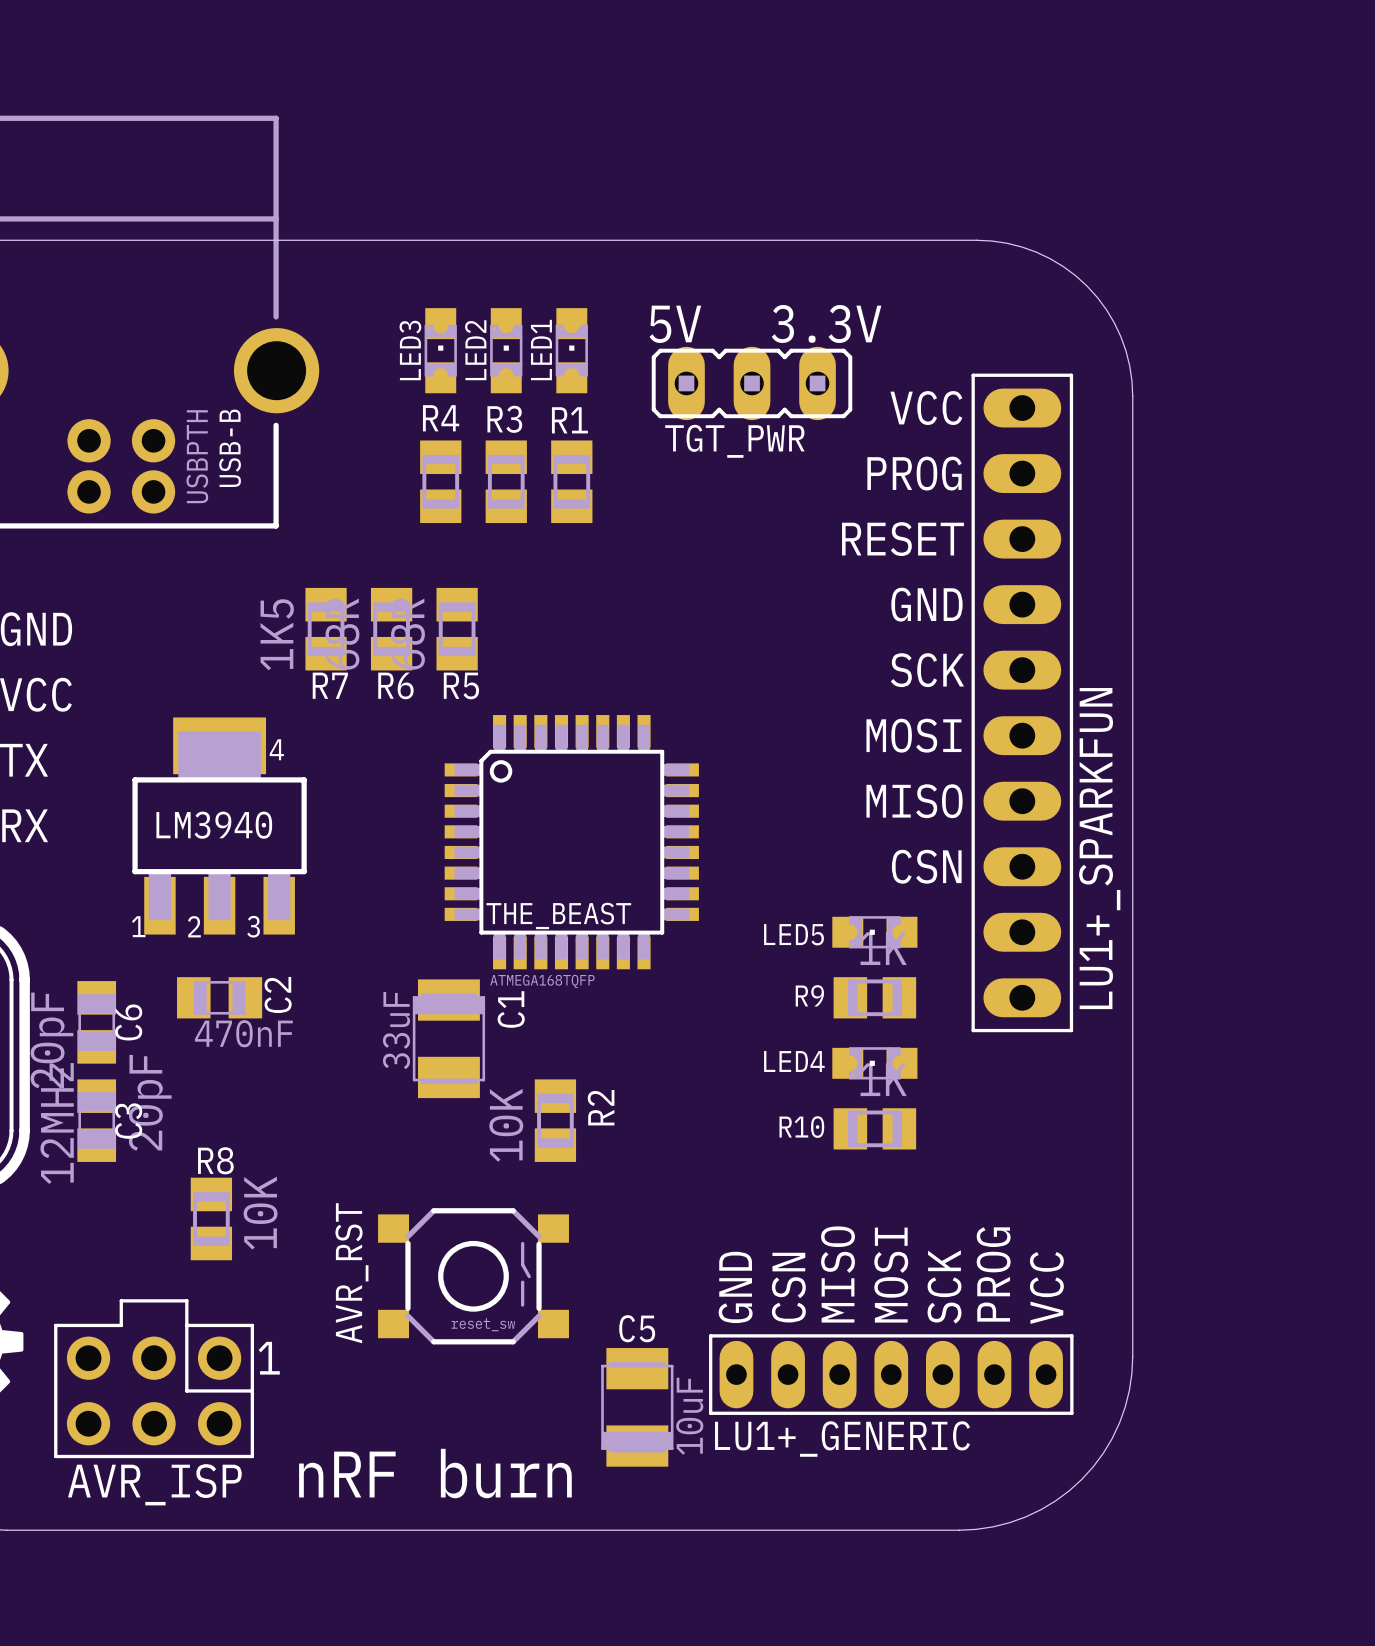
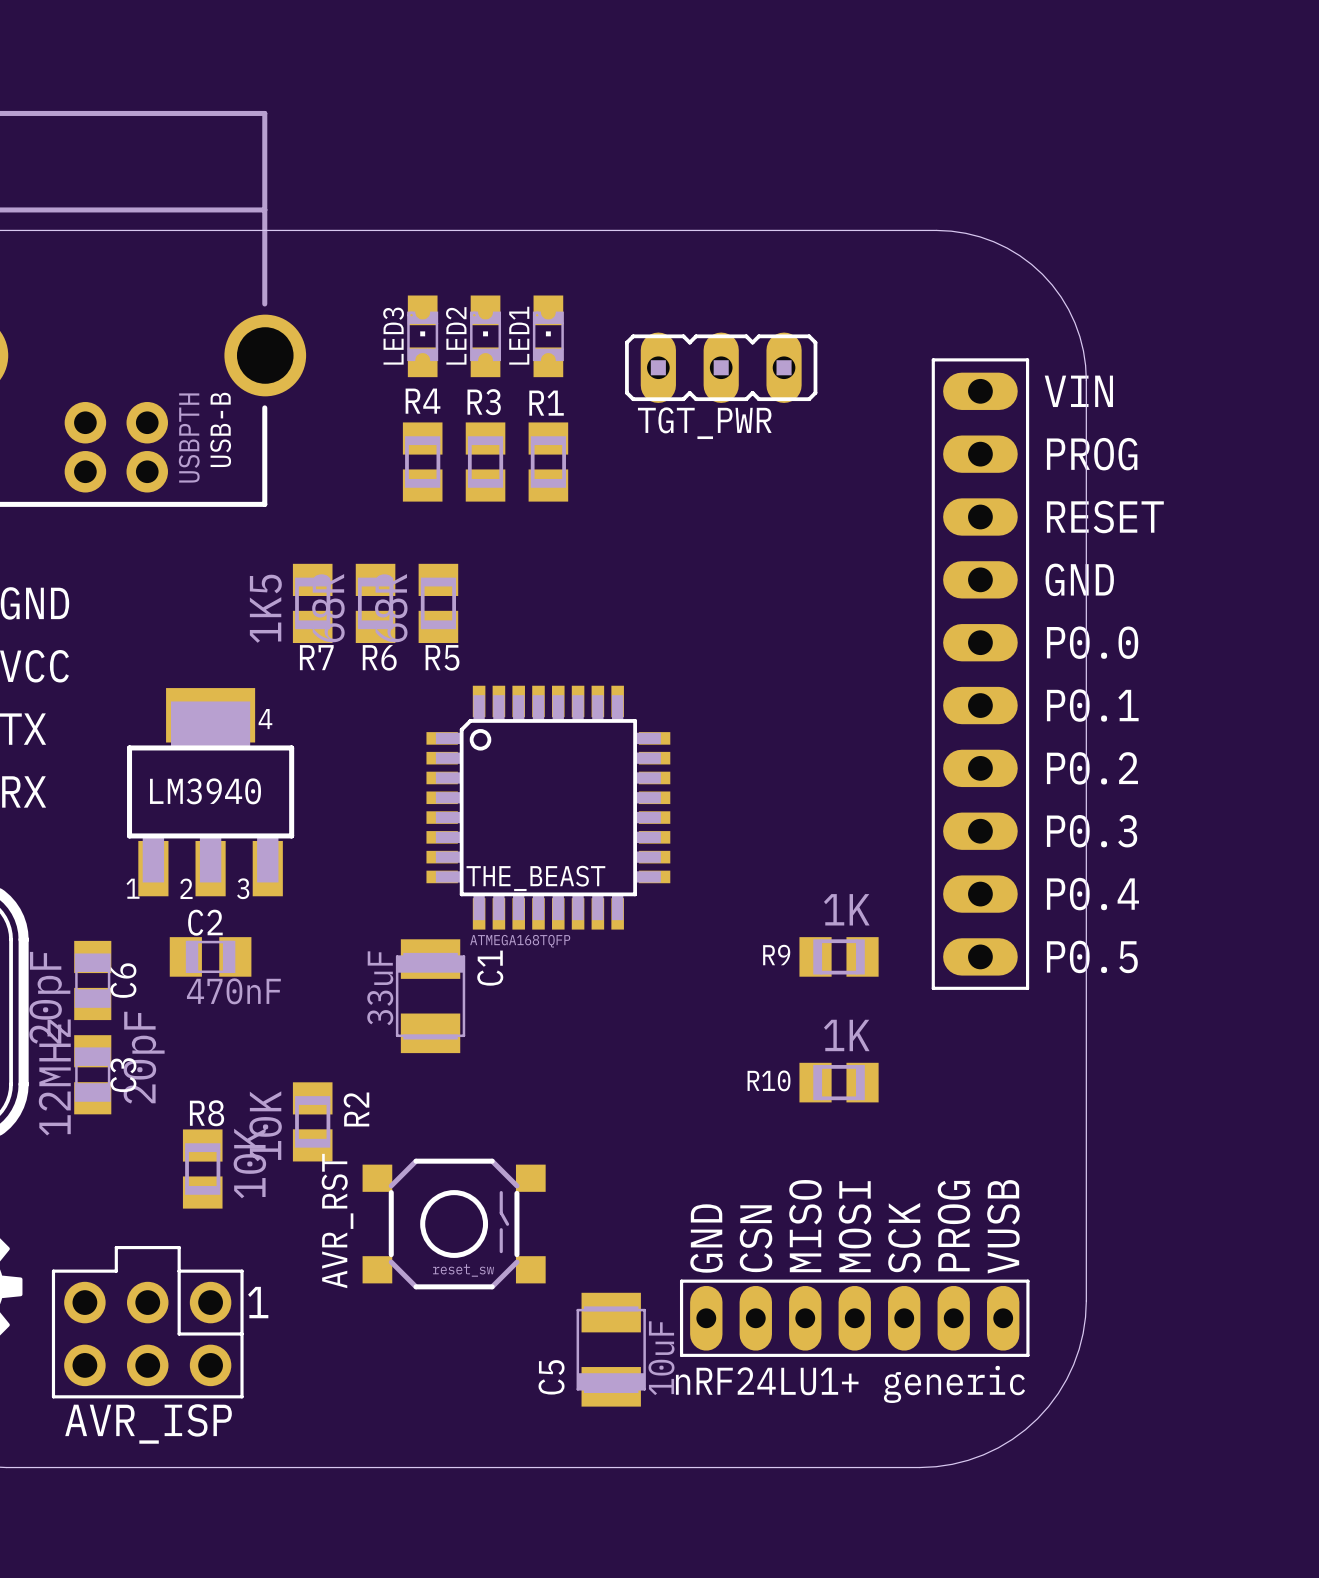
text: 3.3V (826, 323) -> none
text: 5V (675, 324) -> none
LU1+_SPARKFUN footprint: [971, 373, 1074, 1033] -> [931, 358, 1030, 990]
text: VCC (926, 408) -> none
text: PROG (914, 473) -> none
text: RESET (902, 539) -> none
text: GND (926, 604) -> none
text: SCK (927, 670) -> none
text: MOSI (913, 735) -> none
text: MISO (914, 801) -> none
LU1+_SPARKFUN name: LU1+_SPARKFUN (1099, 848) -> none
text: CSN (926, 866) -> none
LED5: (874, 932) -> none
C2 name rotation: 0° (278, 995) -> 90° clockwise (205, 922)
C2 name position: C2 (278, 995) -> C2 (205, 922)
LED4: (874, 1063) -> none
R2 position: (555, 1120) -> (312, 1121)
text: MISO (838, 1274) -> none
text: PROG (993, 1274) -> none
text: MOSI (891, 1275) -> none
LU1+_GENERIC text: none -> MISO (805, 1226)
LU1+_GENERIC text: none -> PROG (953, 1226)
LU1+_GENERIC text: none -> MOSI (854, 1226)
LU1+_GENERIC text: none -> VUSB (1003, 1226)
text: SCK (944, 1286) -> none
text: GND (735, 1287) -> none
text: CSN (788, 1287) -> none
text: VCC (1046, 1287) -> none
LU1+_GENERIC text: none -> SCK (904, 1238)
LU1+_GENERIC text: none -> GND (706, 1238)
LU1+_GENERIC text: none -> CSN (756, 1238)
C5 name rotation: 0° (637, 1328) -> 90° counterclockwise (551, 1377)
C5 name position: C5 (637, 1328) -> C5 (551, 1377)
LU1+_GENERIC name: LU1+_GENERIC (842, 1439) -> none
LU1+_GENERIC text: none -> nRF24LU1+ generic (850, 1384)
text: nRF burn (435, 1473) -> none

